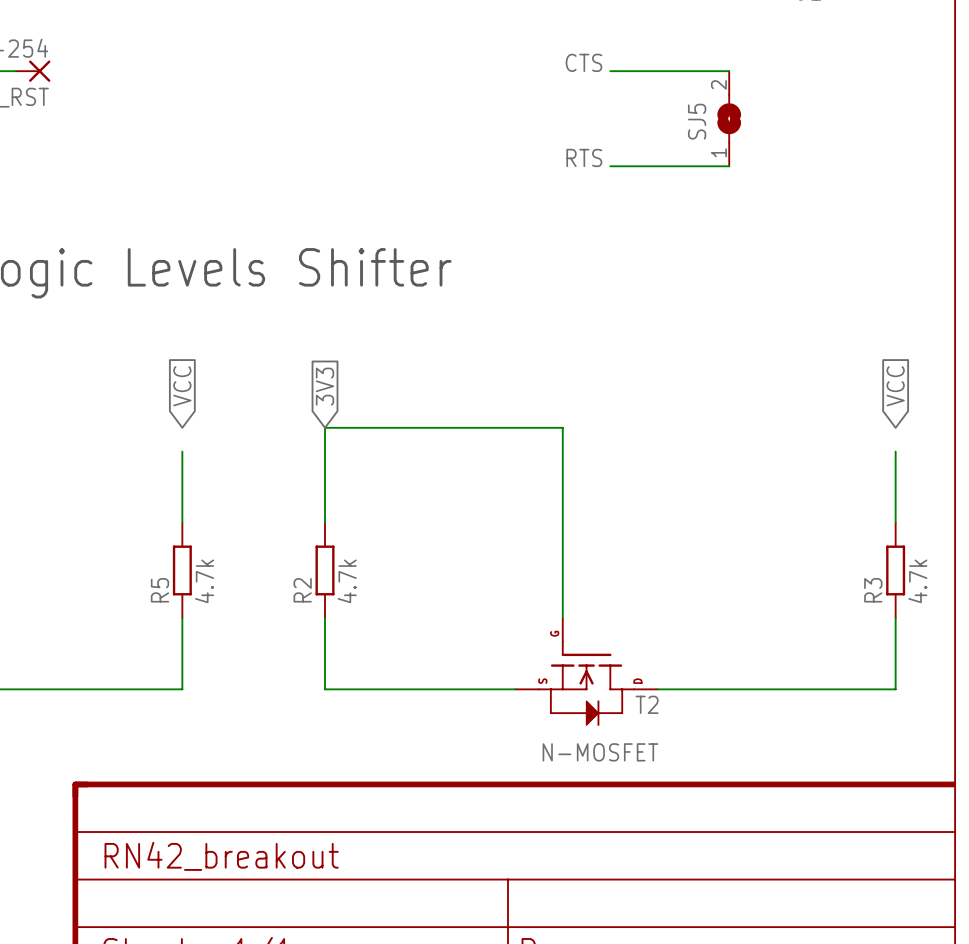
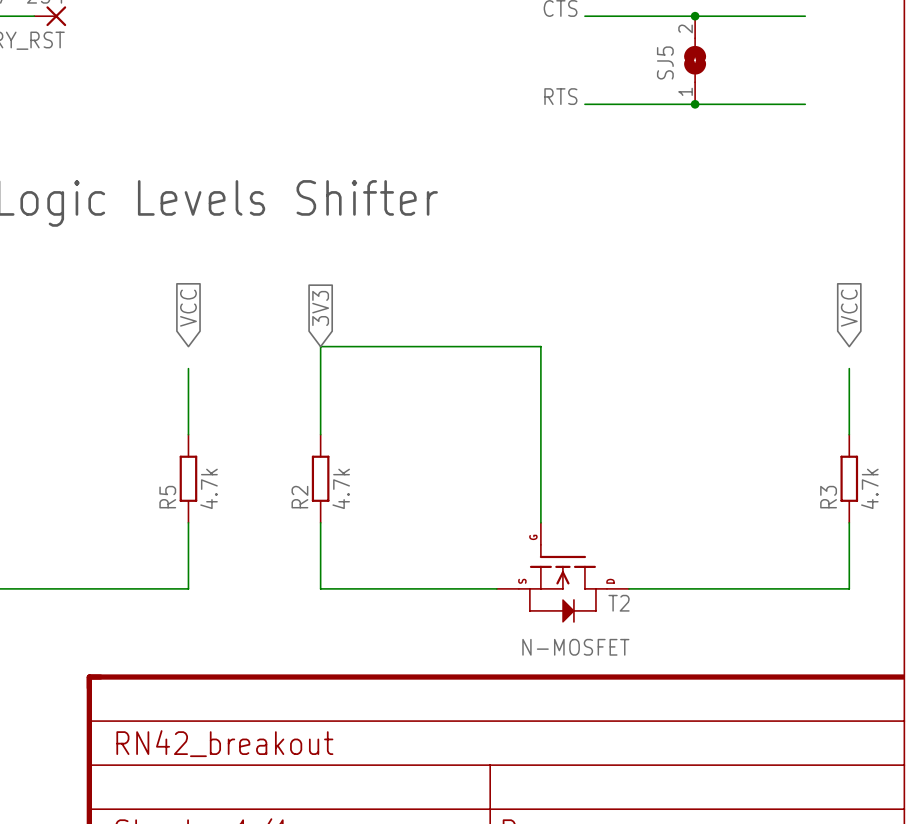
wire: none -> (695, 16) (805, 16)
junction: none -> (695, 16)
wire: none -> (695, 104) (805, 104)
junction: none -> (695, 104)

